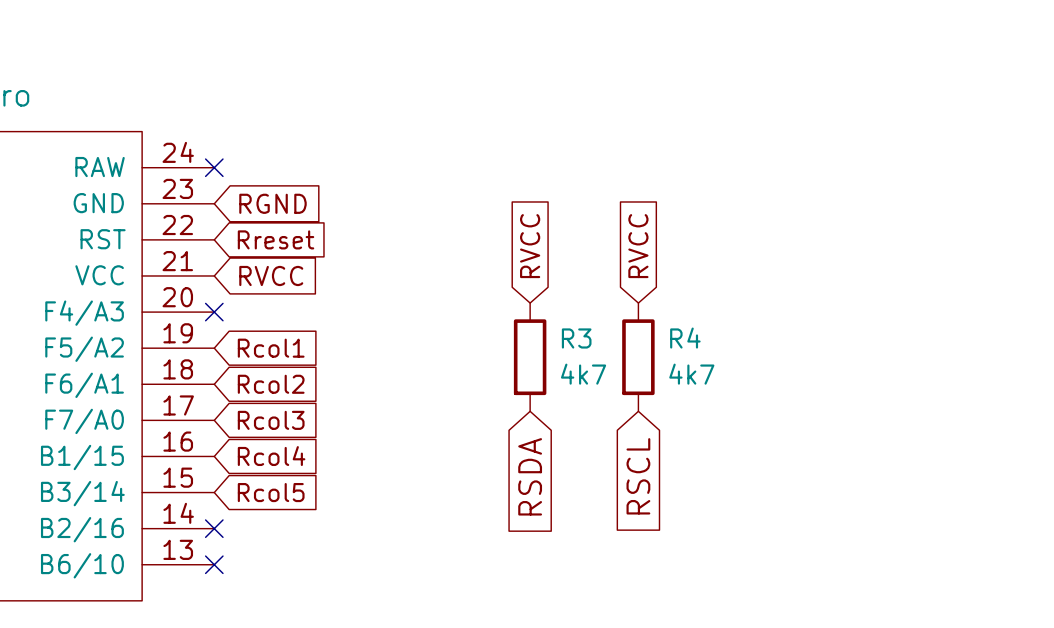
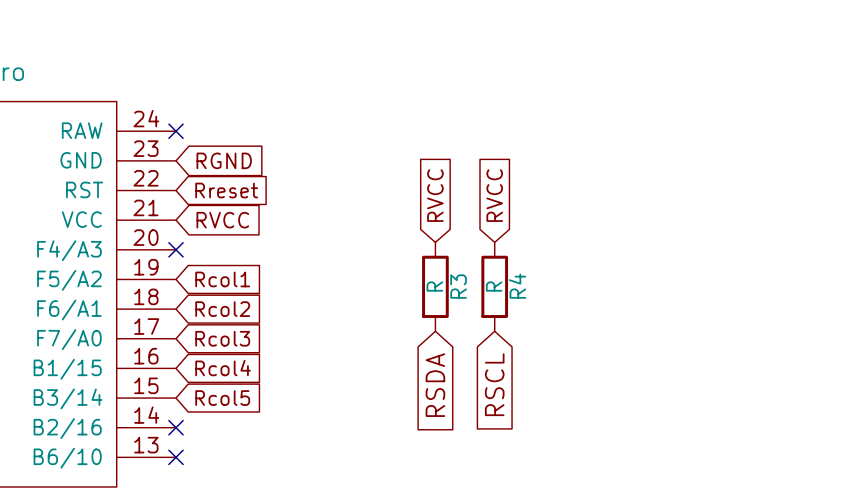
global label position: RVCC (638, 246) -> RVCC (494, 195)
R3 name rotation: 0° (576, 338) -> 90° counterclockwise (458, 286)
R4 name rotation: 0° (685, 338) -> 90° counterclockwise (517, 286)
R4 position: (638, 357) -> (494, 286)
R3 value: 4k7 (583, 374) -> R (434, 286)
R4 value: 4k7 (691, 374) -> R (494, 286)
global label position: RSCL (638, 476) -> RSCL (494, 384)

